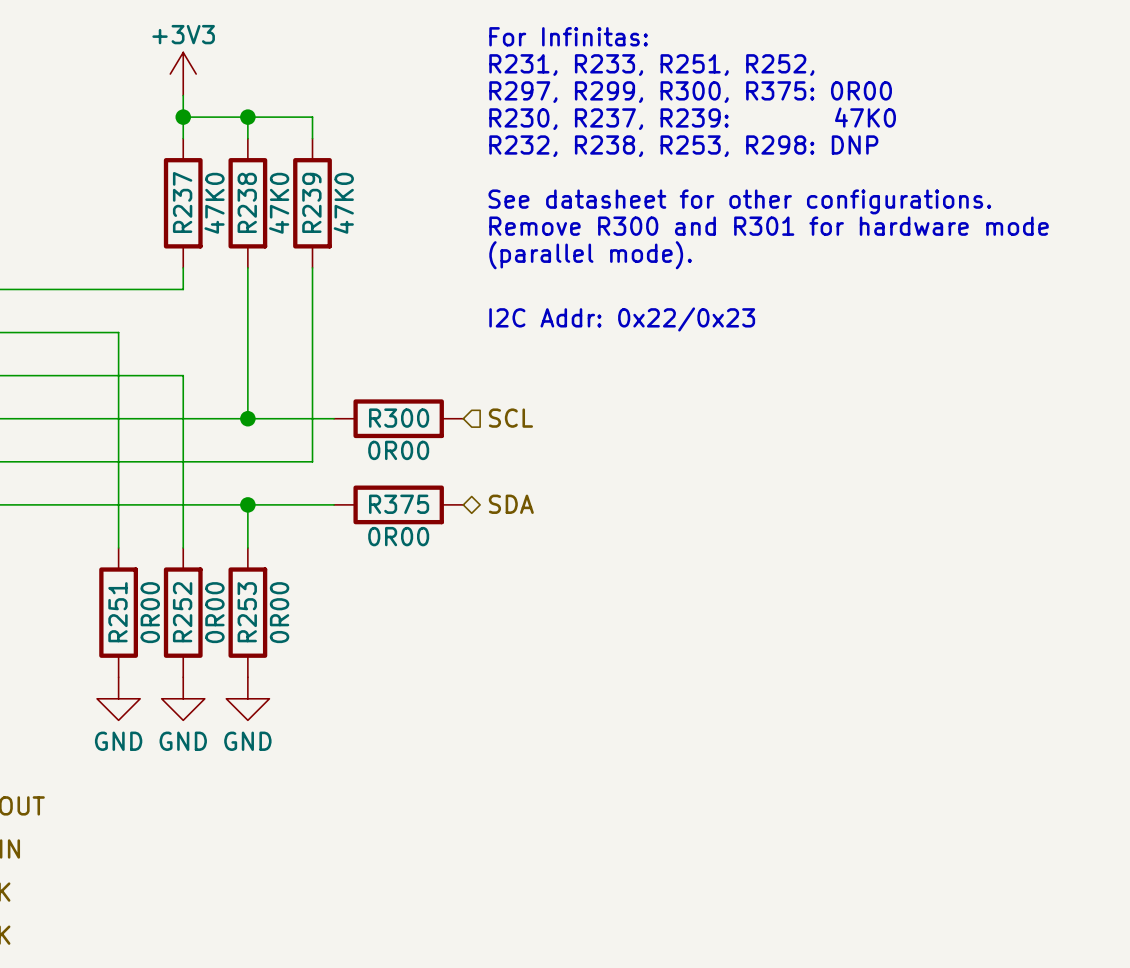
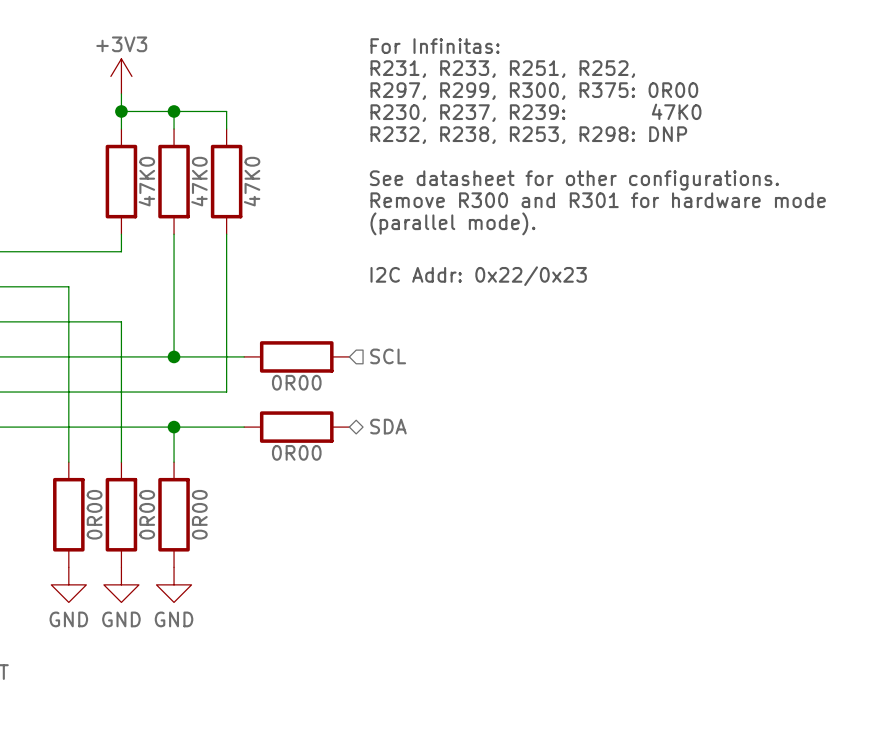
R237 name: R237 (182, 202) -> none
R238 name: R238 (247, 202) -> none
R239 name: R239 (311, 202) -> none
R300 name: R300 (399, 418) -> none
R375 name: R375 (399, 504) -> none
R251 name: R251 (117, 612) -> none
R252 name: R252 (182, 612) -> none
R253 name: R253 (247, 612) -> none

